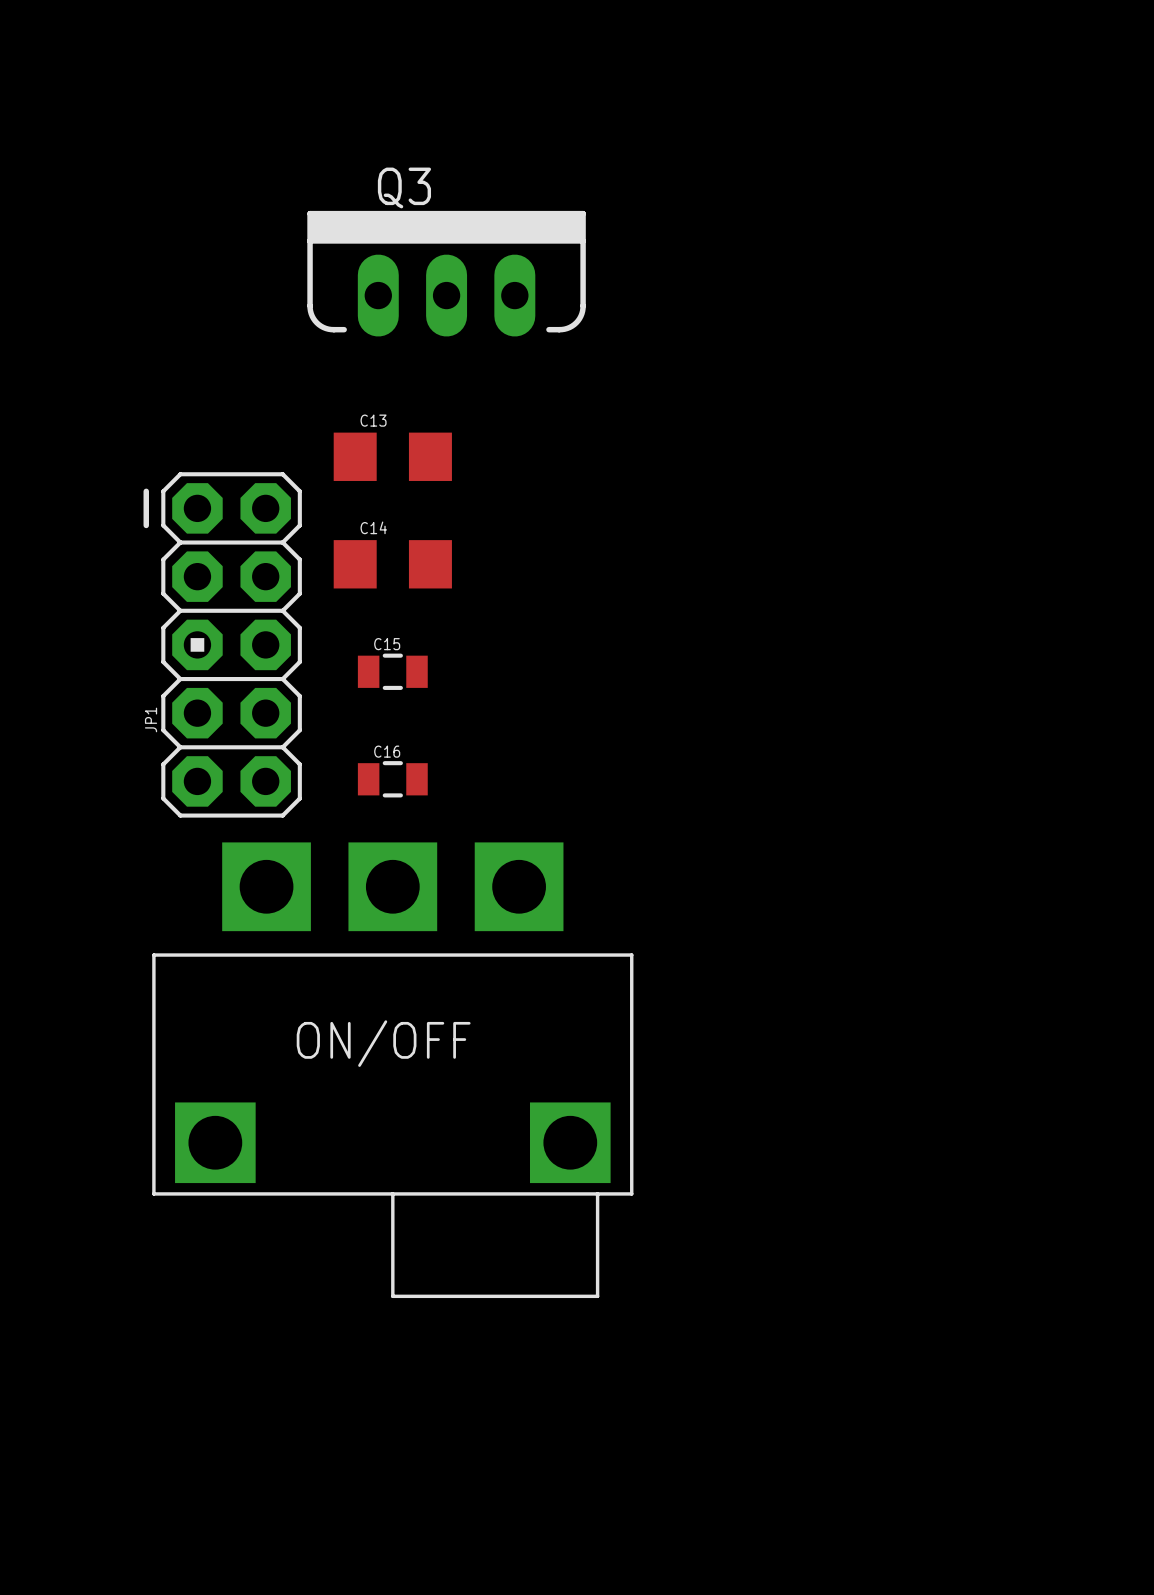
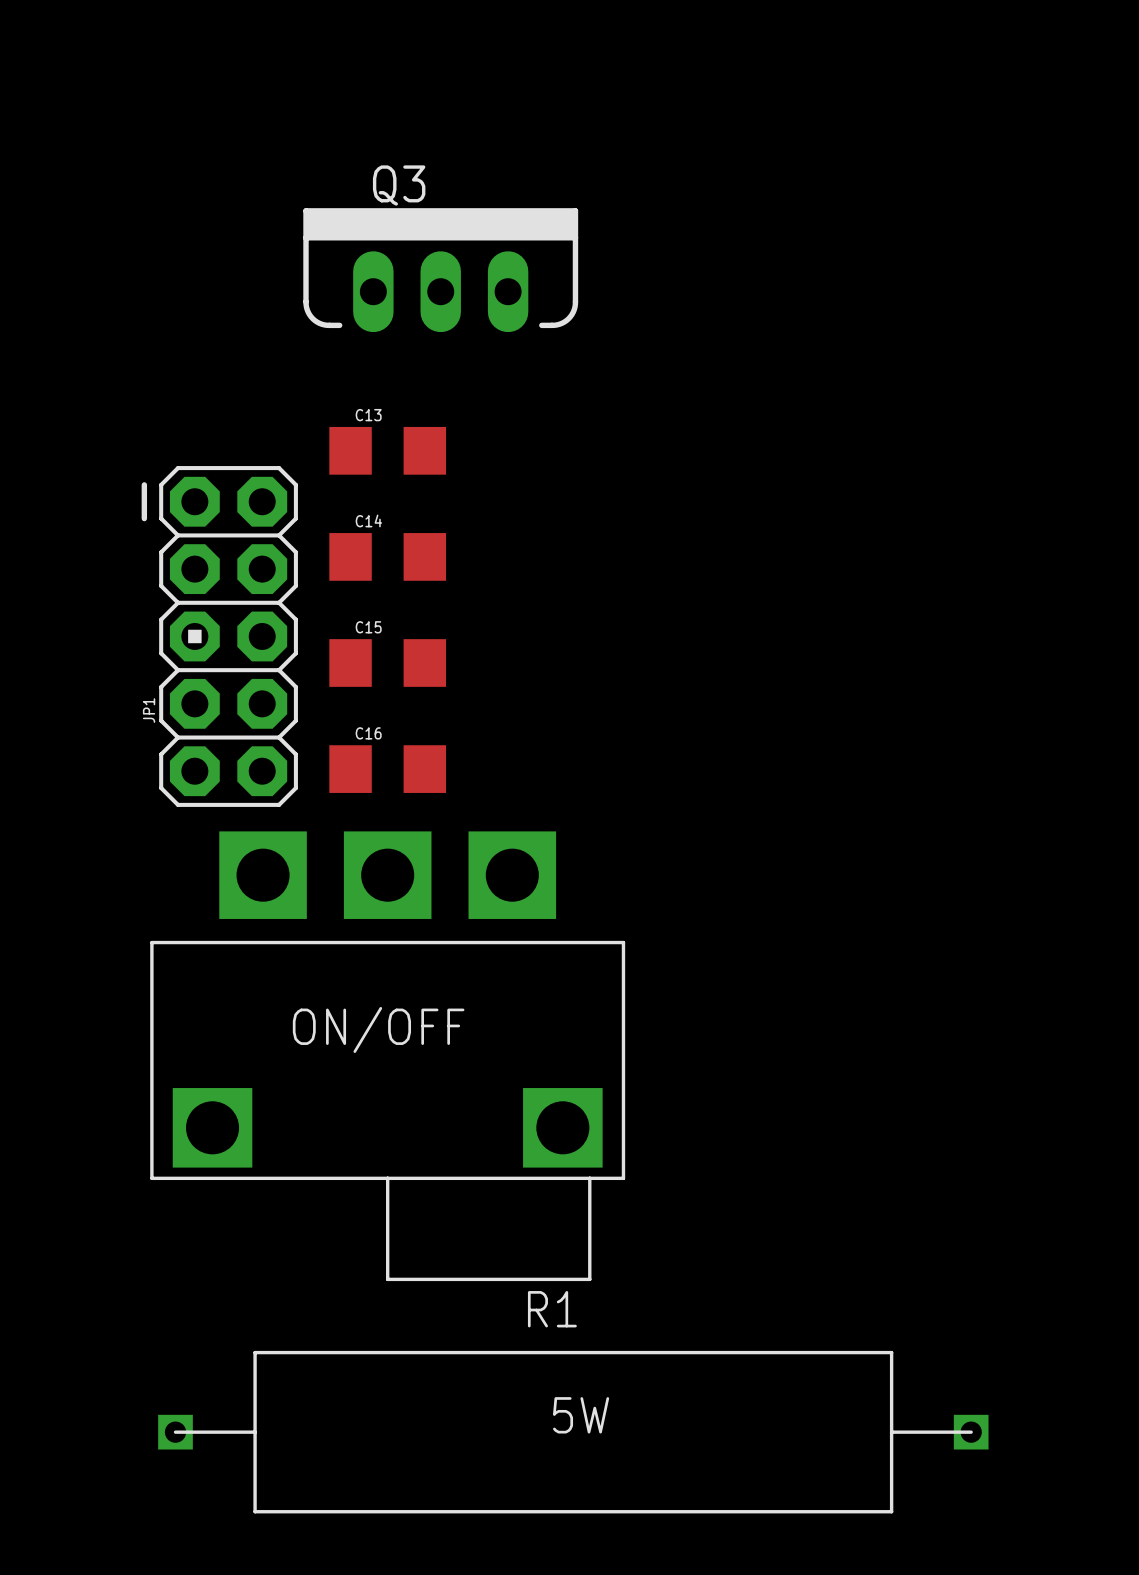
C15 footprint: [357, 653, 428, 690] -> [329, 639, 447, 687]
C16 footprint: [357, 761, 428, 798] -> [329, 745, 447, 793]
R1: none -> (573, 1432)

